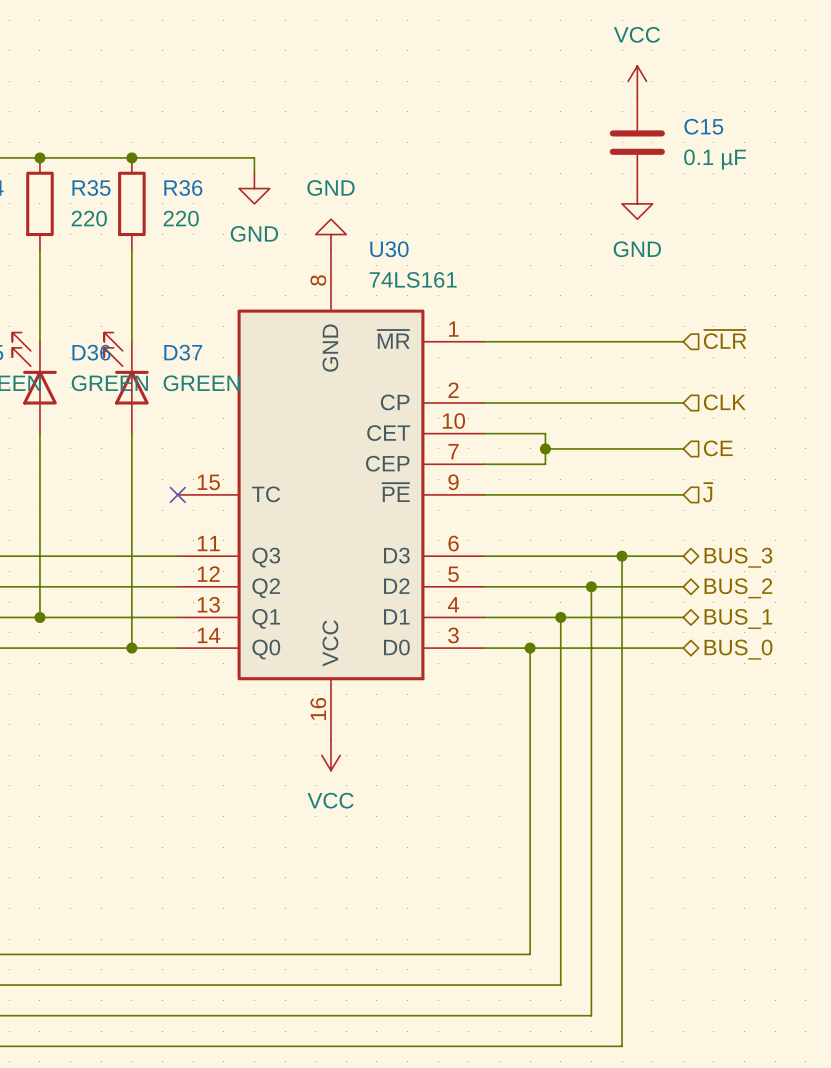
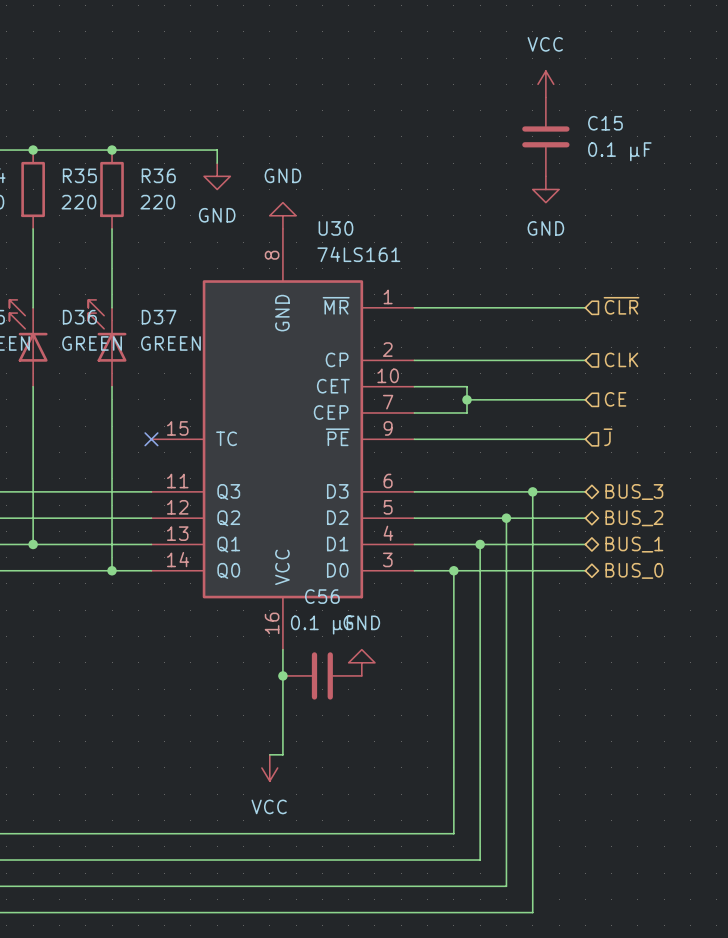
wire: none -> (282, 649) (282, 754) (269, 754)
power symbol position: VCC (330, 755) -> VCC (269, 767)
power symbol: none -> GND (361, 662)
junction: none -> (282, 675)
C56: none -> 0.1 µF (322, 675)

